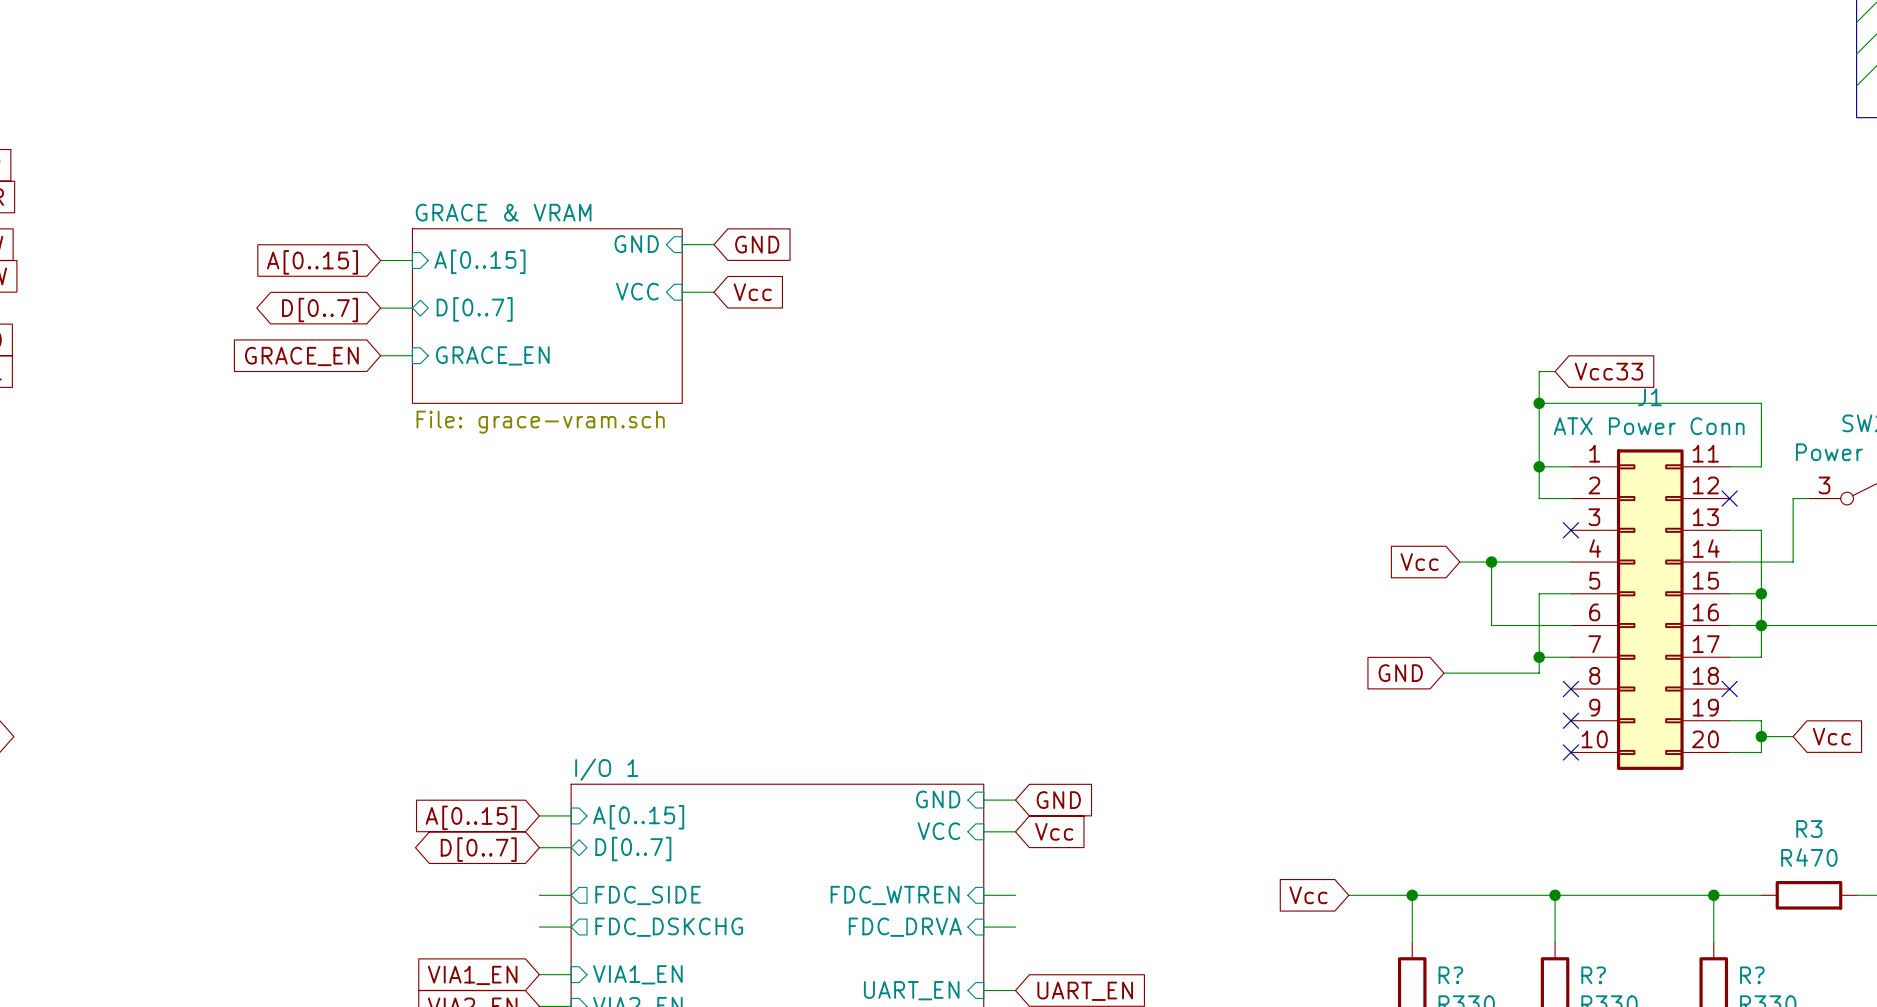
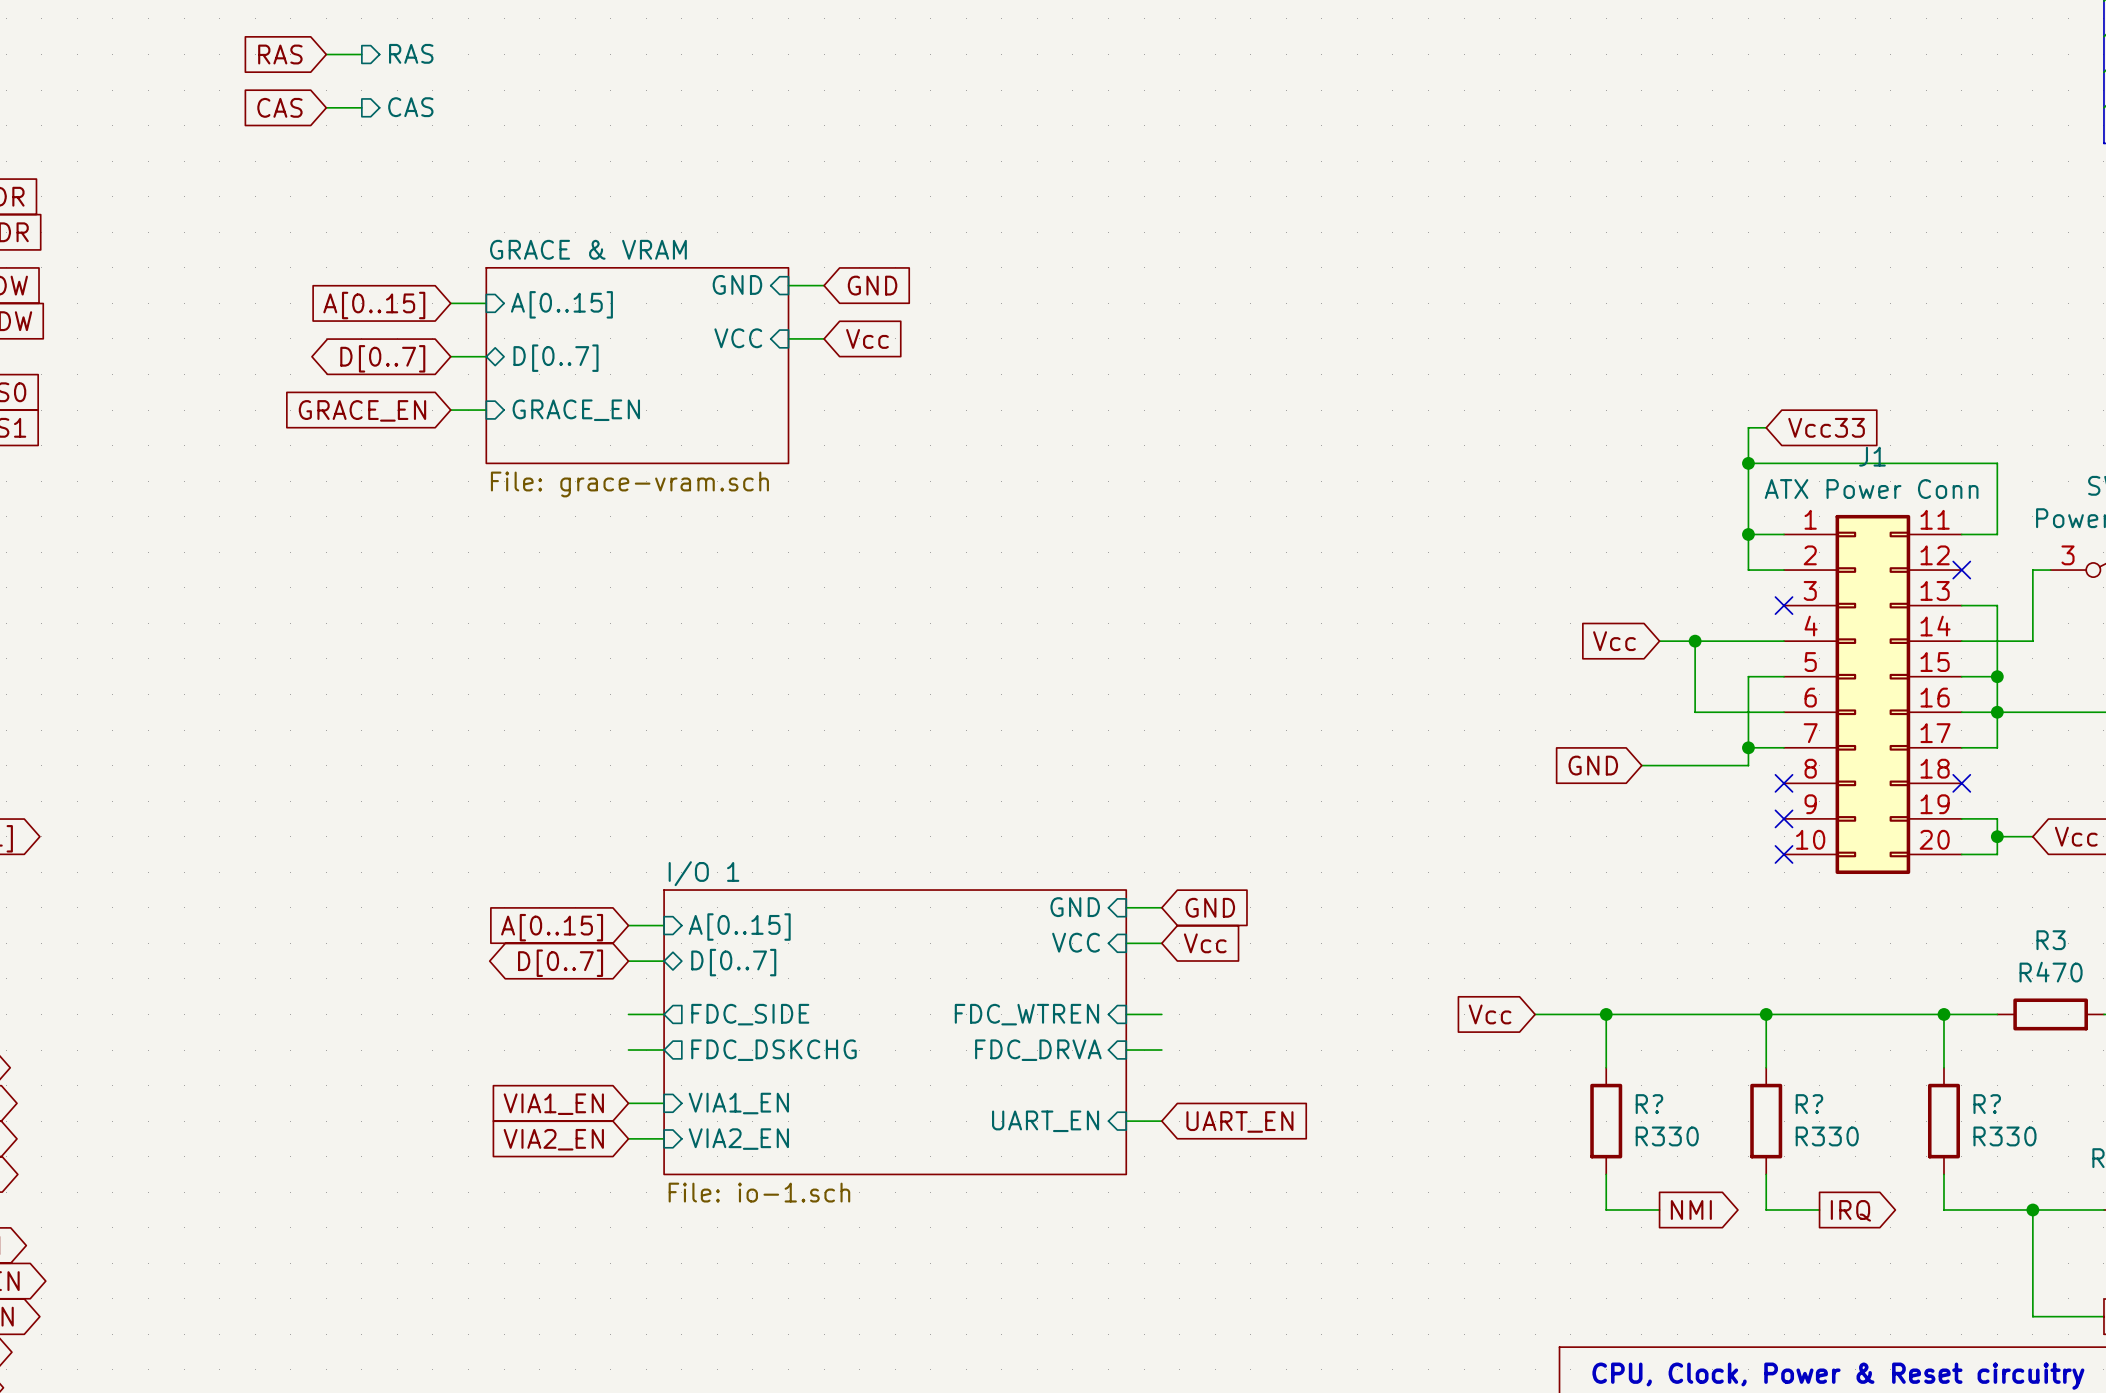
sheet pin: none -> RAS (411, 53)
global label: none -> RAS (280, 54)
wire: none -> (326, 54) (361, 54)
global label: none -> CAS (279, 107)
wire: none -> (326, 107) (361, 107)
sheet pin: none -> CAS (410, 107)

